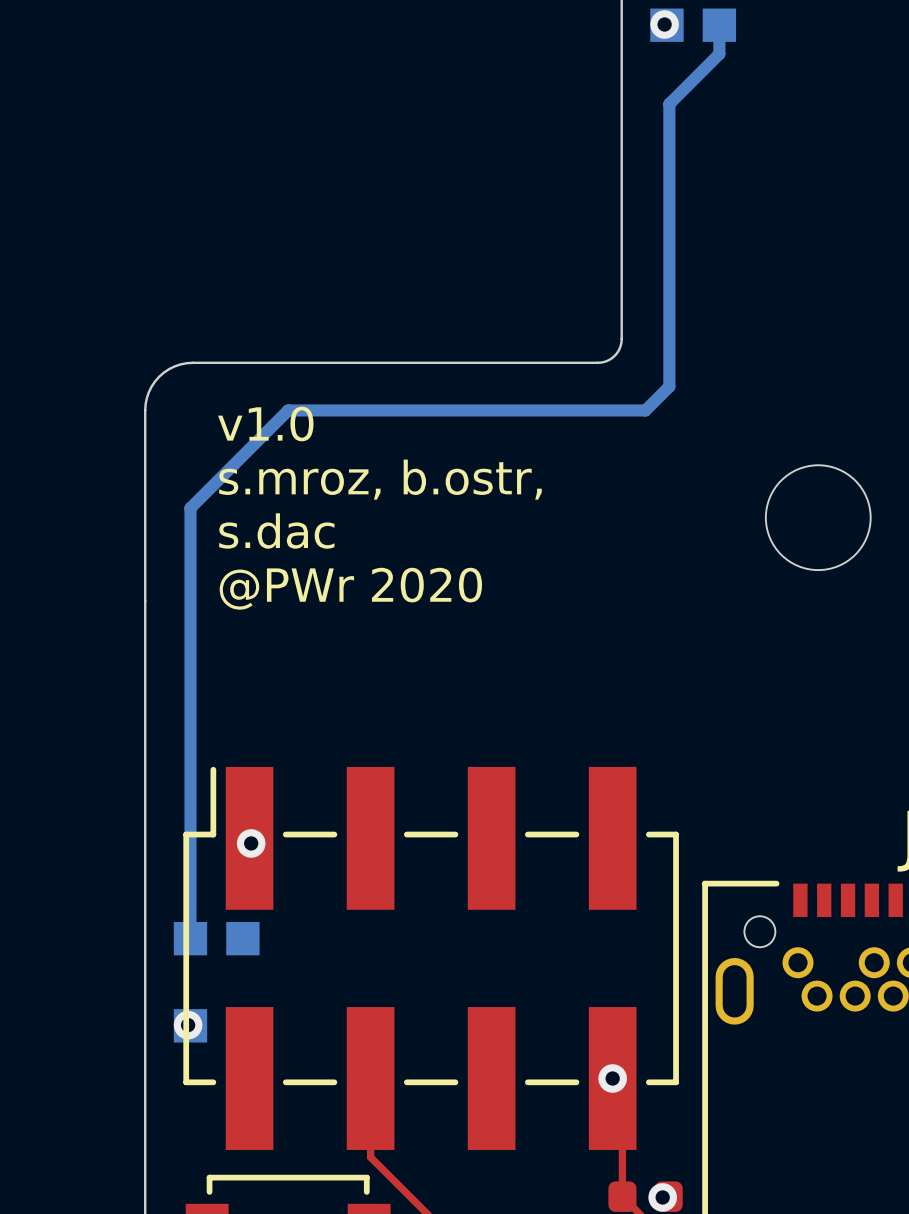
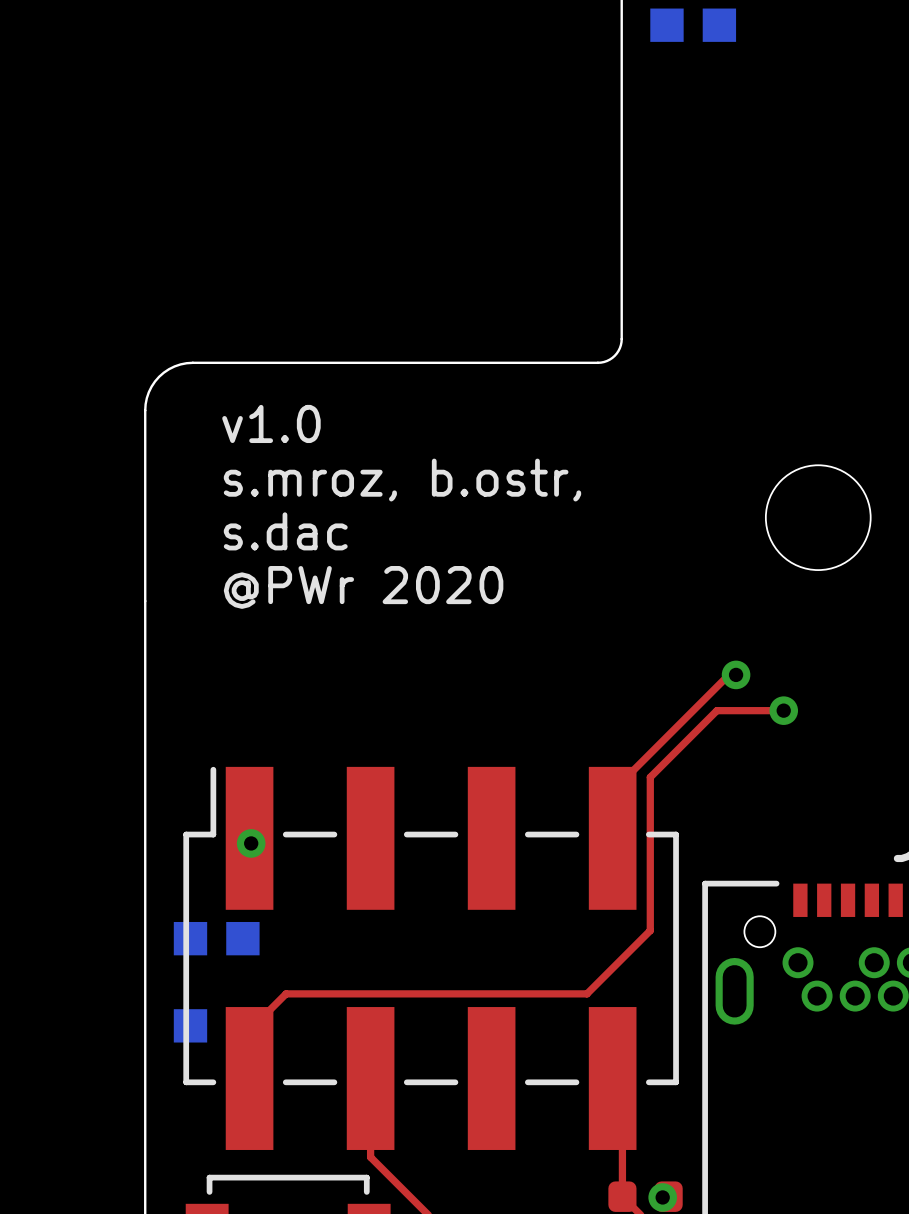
via: (664, 24) -> none
bottom track: (719, 25) (719, 54) (669, 104) (669, 386) (645, 410) (288, 410) (190, 508) (190, 938) -> none
top track: none -> (736, 674) (728, 674) (612, 791) (612, 838)
via: none -> (736, 674)
via: none -> (783, 710)
top track: none -> (783, 715) (783, 710) (716, 710) (650, 777) (650, 930) (587, 993) (286, 993) (249, 1030) (249, 1078)
via: (188, 1025) -> none
via: (612, 1078) -> none

